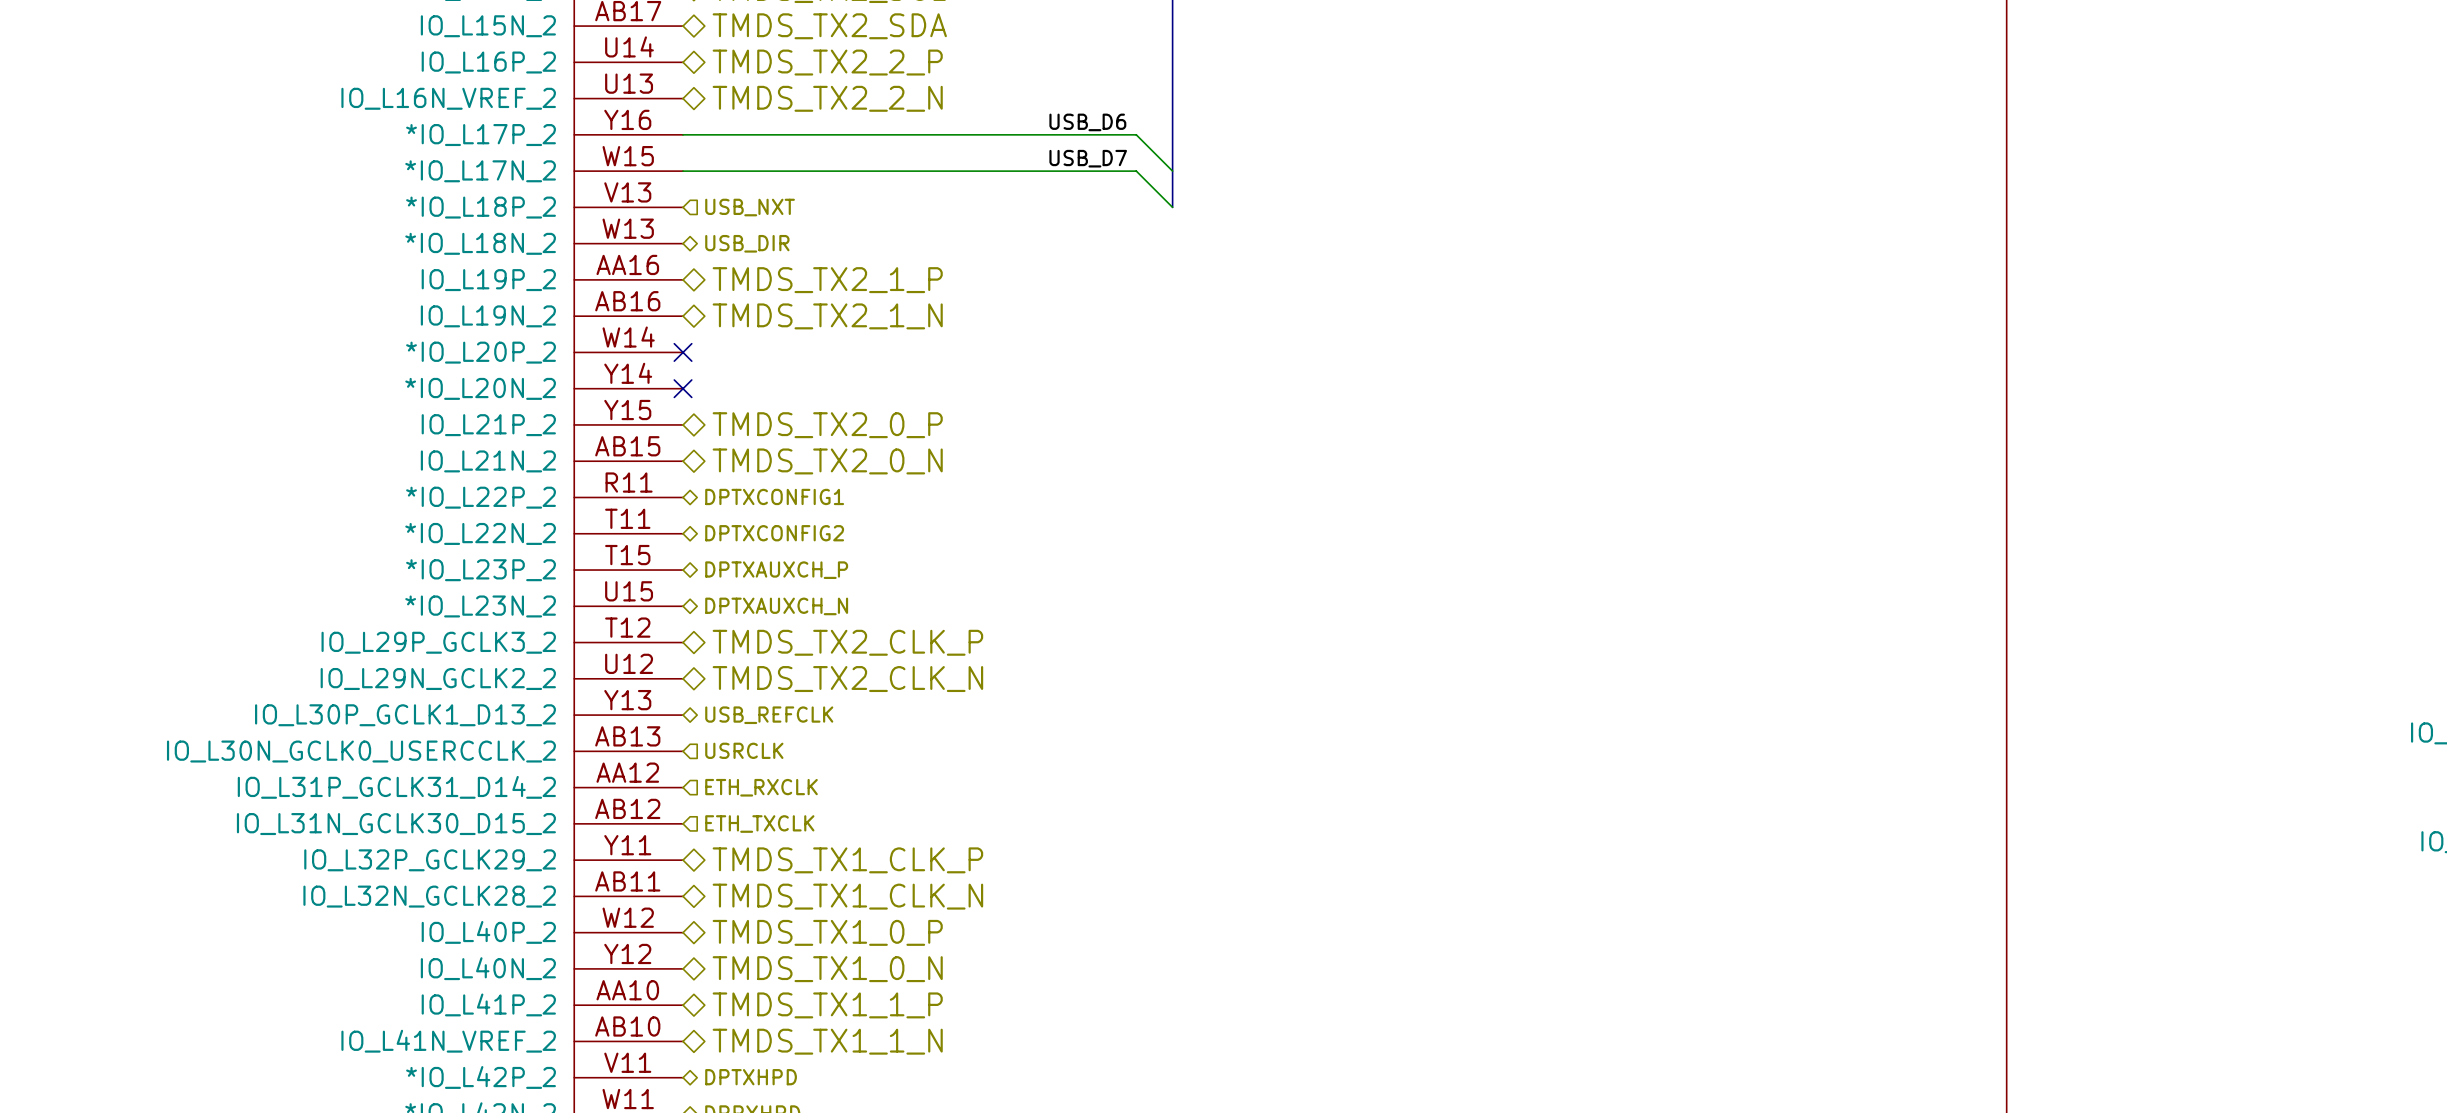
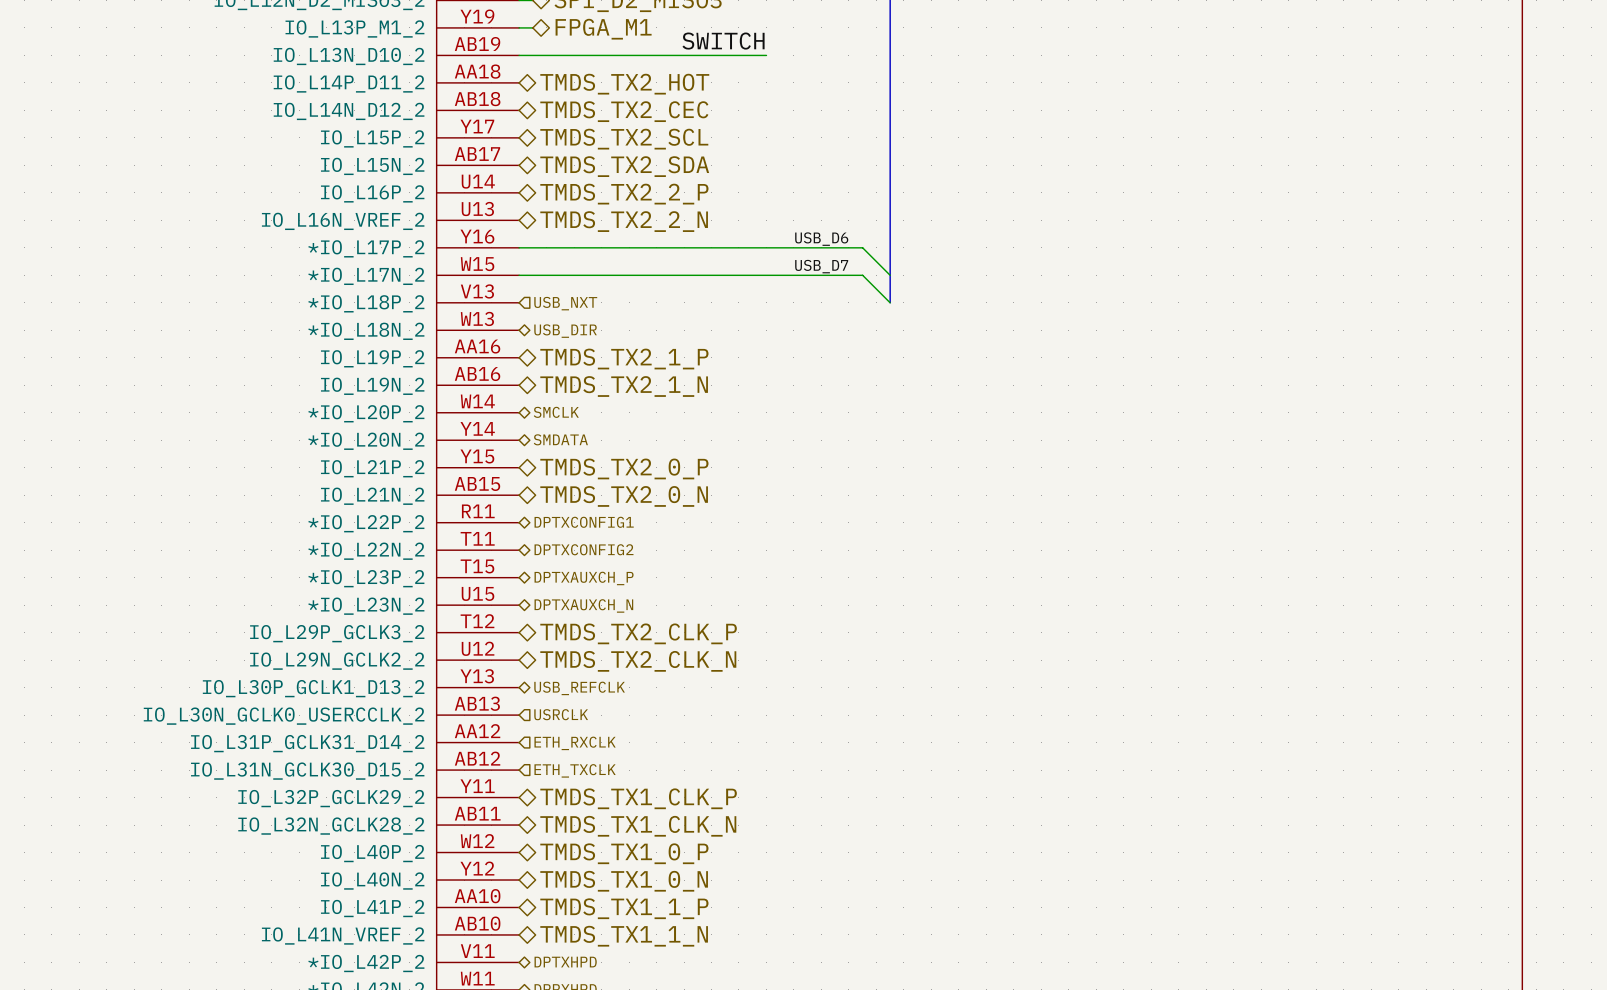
hierarchical label: none -> SMCLK (556, 412)
no-connect mark: (683, 352) -> none
no-connect mark: (683, 388) -> none
hierarchical label: none -> SMDATA (560, 439)

